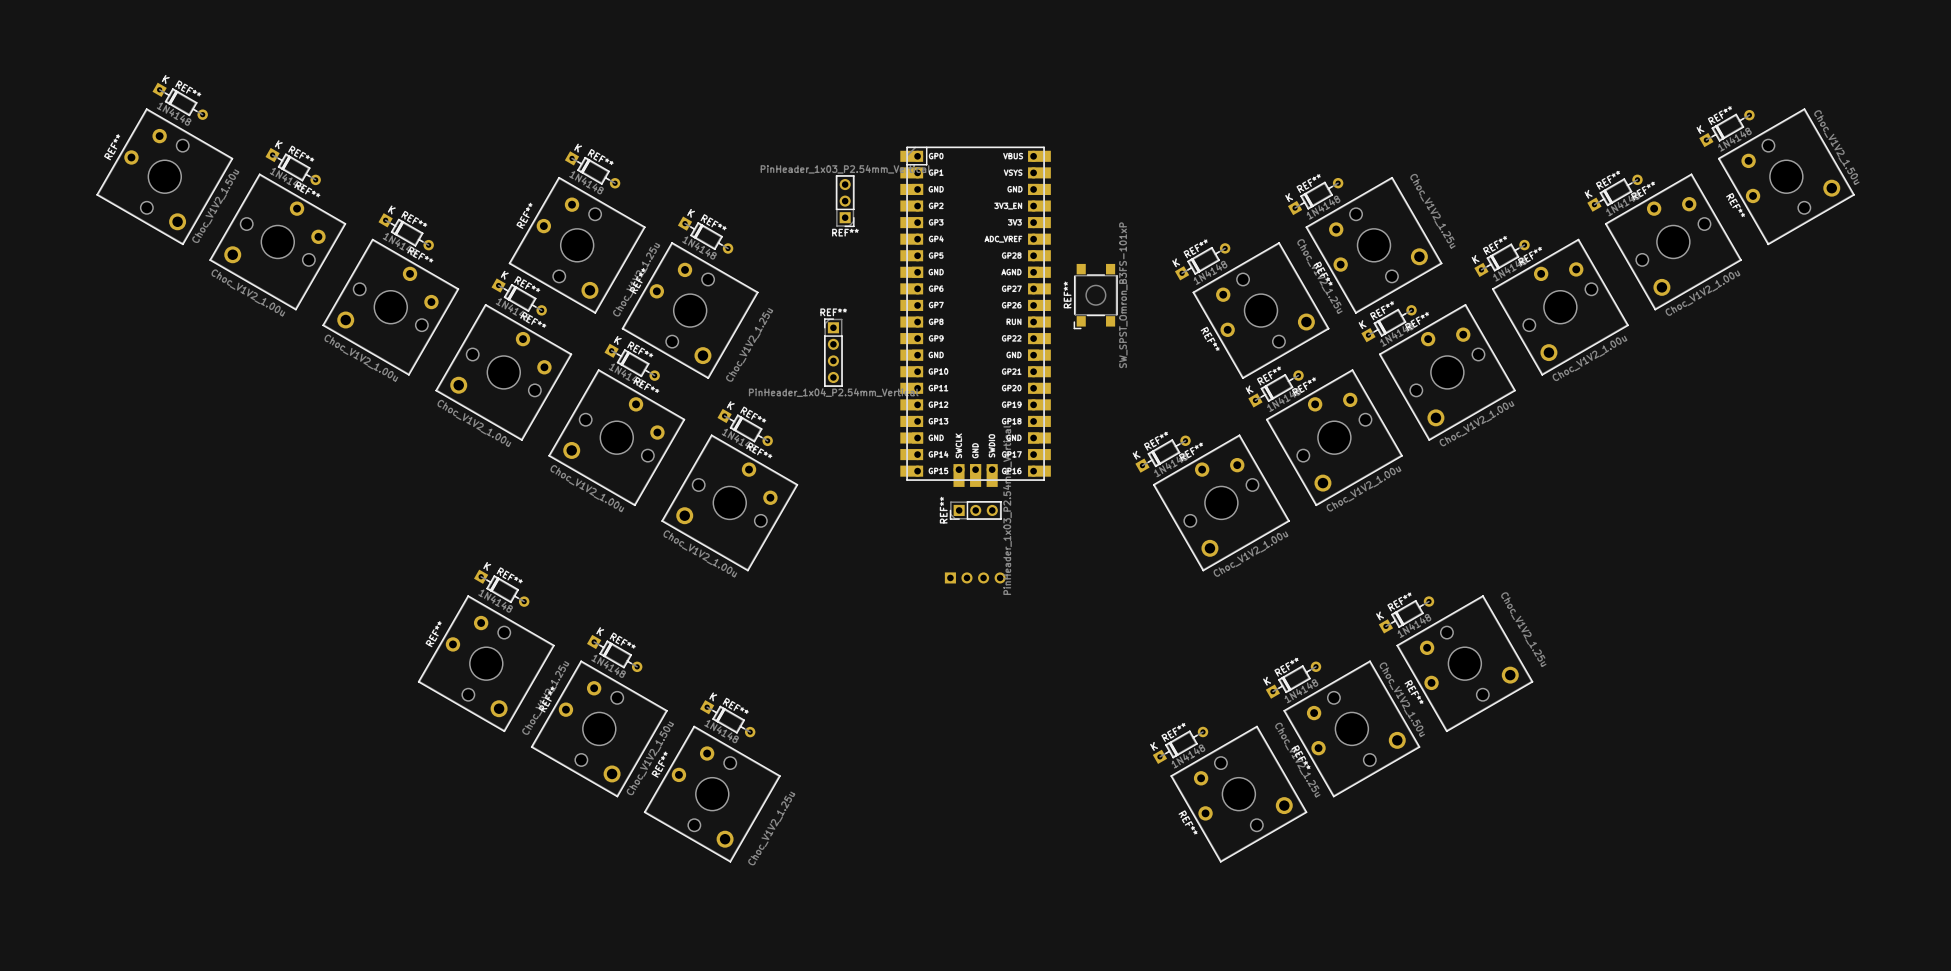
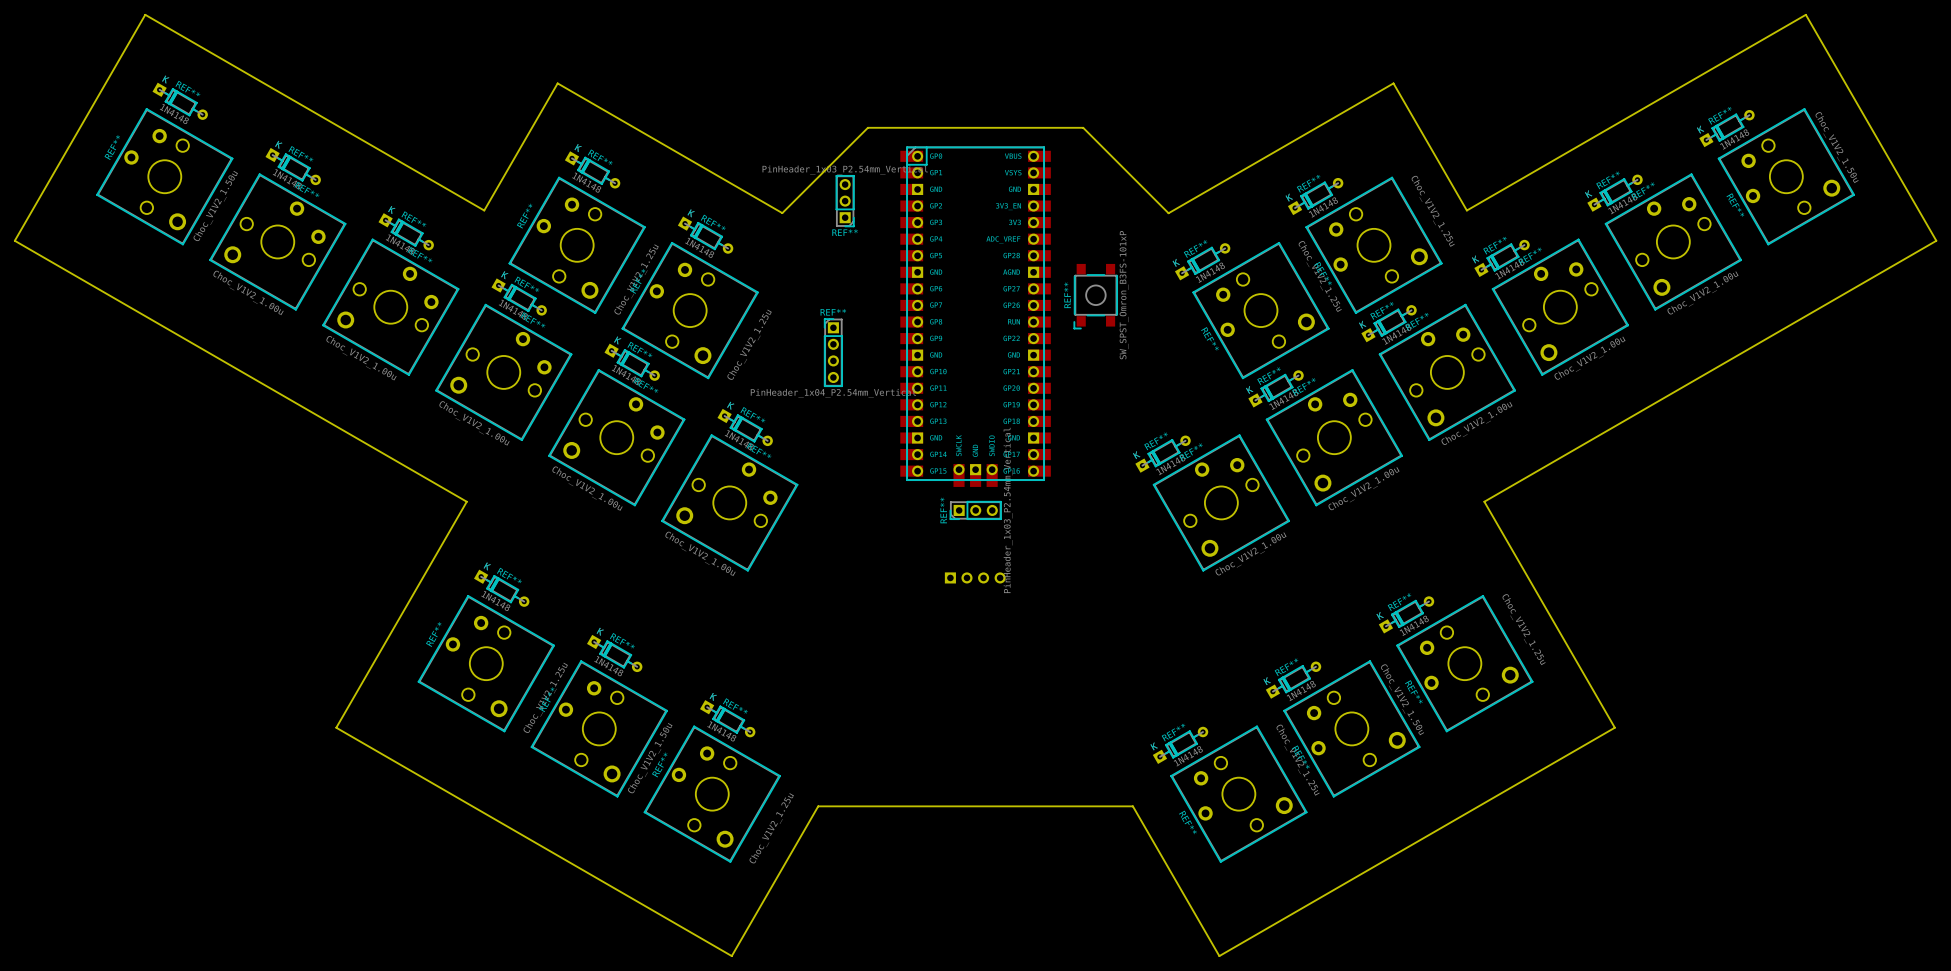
board edge: none -> (145, 14) (484, 210) (557, 83) (782, 213) (867, 127) (1083, 127) (1168, 213) (1393, 83) (1466, 210) (1805, 14) (1936, 240) (1484, 501) (1614, 727) (1219, 956) (1132, 806) (818, 806) (731, 956) (336, 727) (466, 501) (14, 240) (145, 14)

